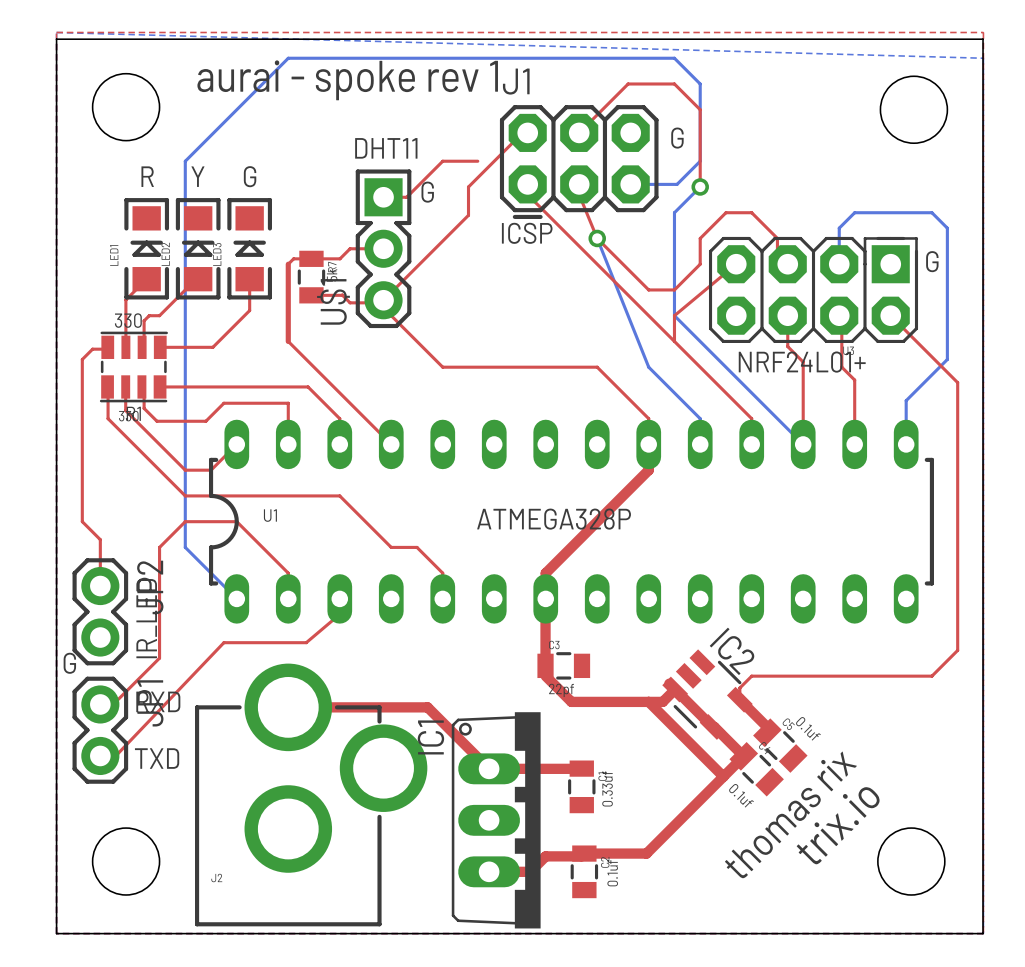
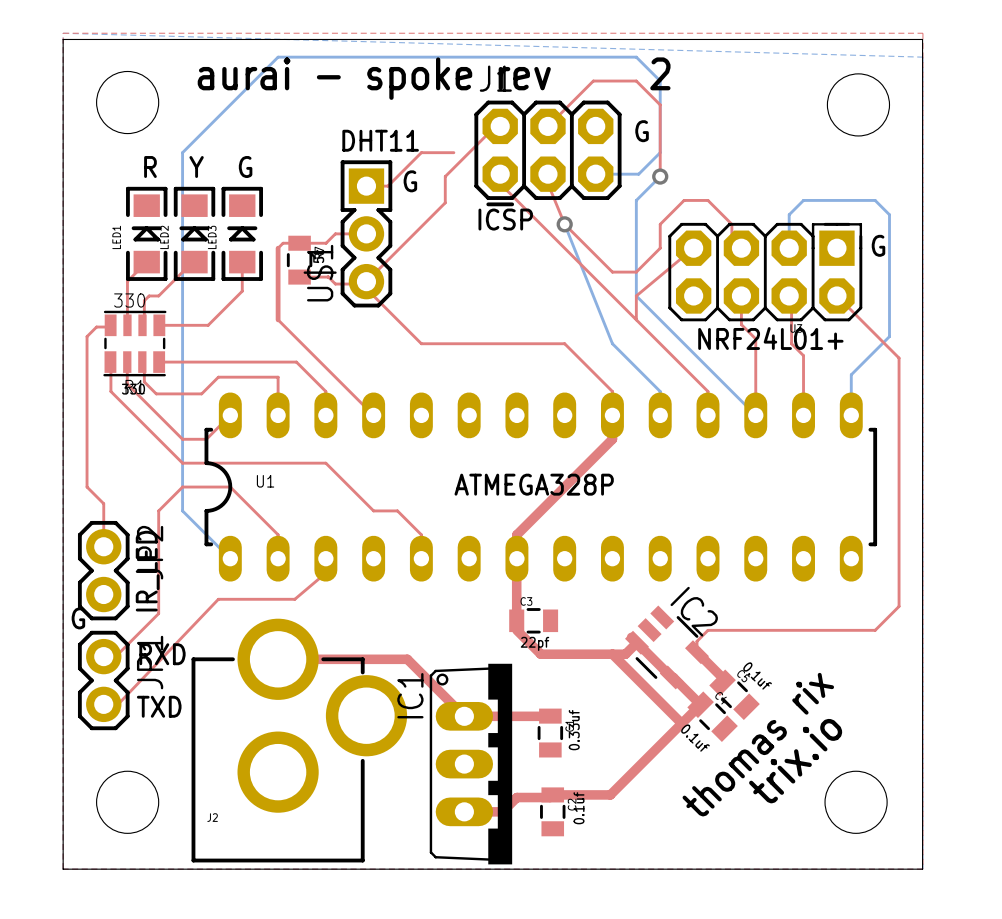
text: none -> 2 (660, 73)
text: aurai - spoke rev 1 (347, 80) -> aurai - spoke rev (374, 78)

